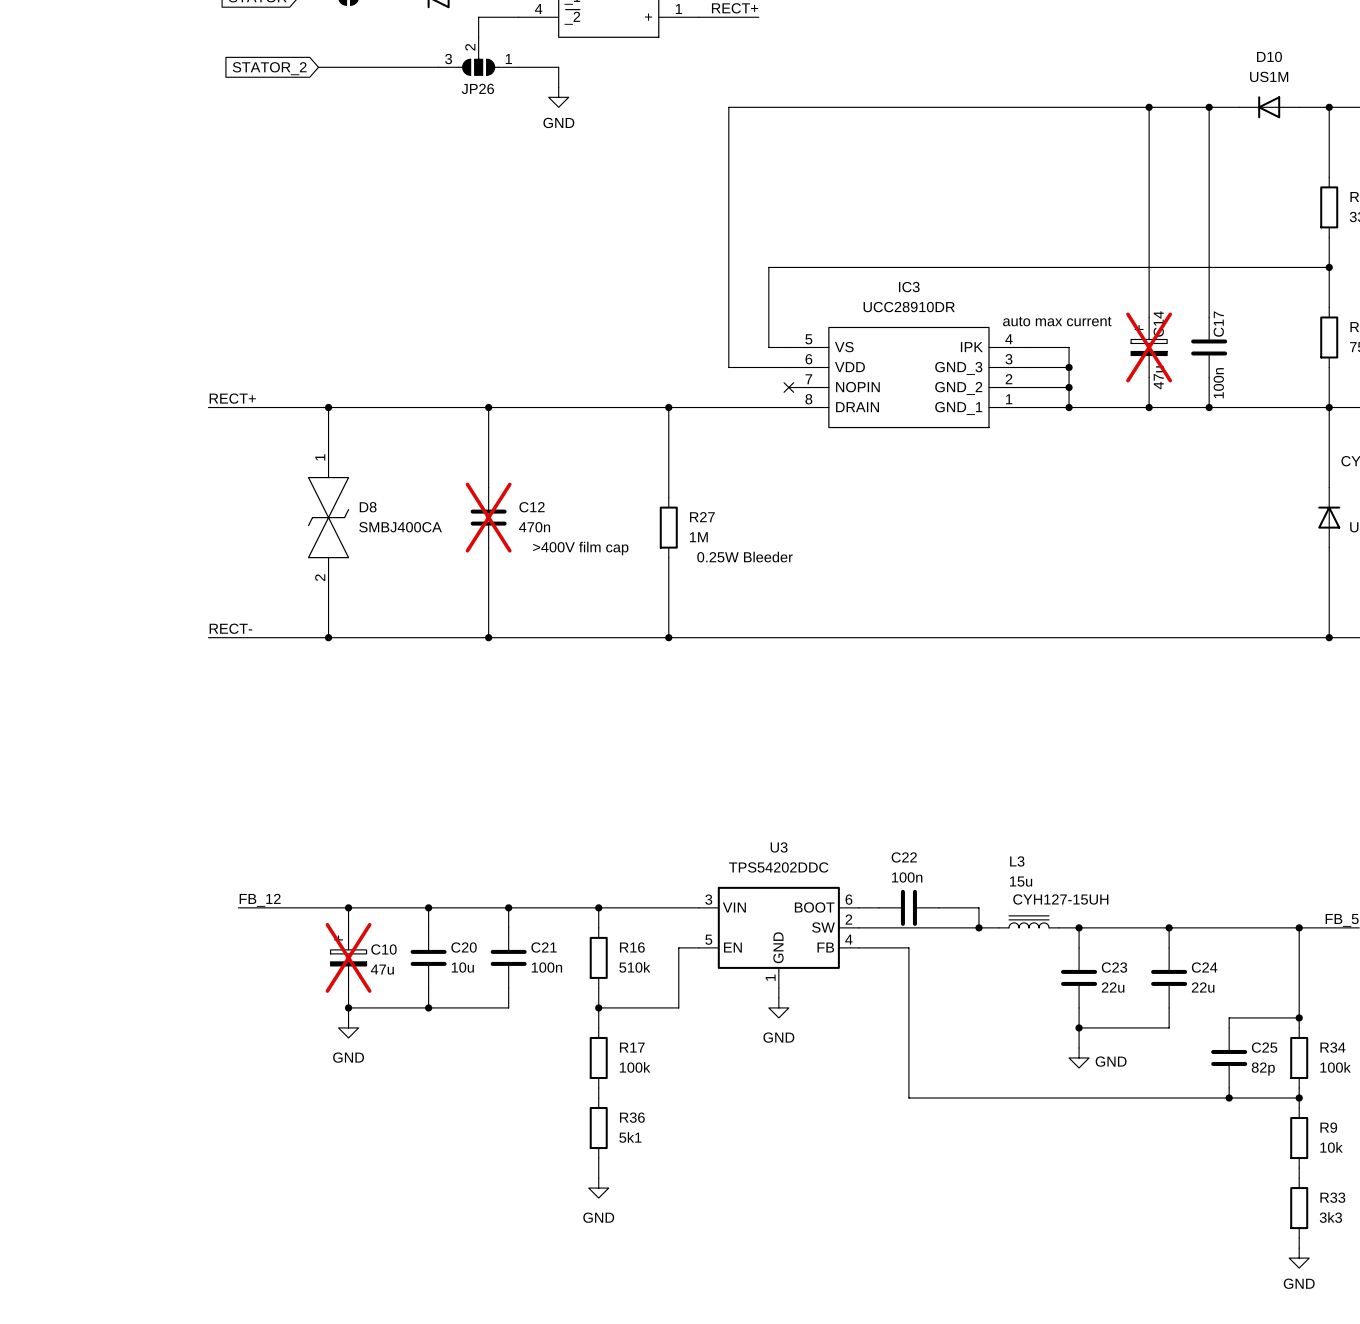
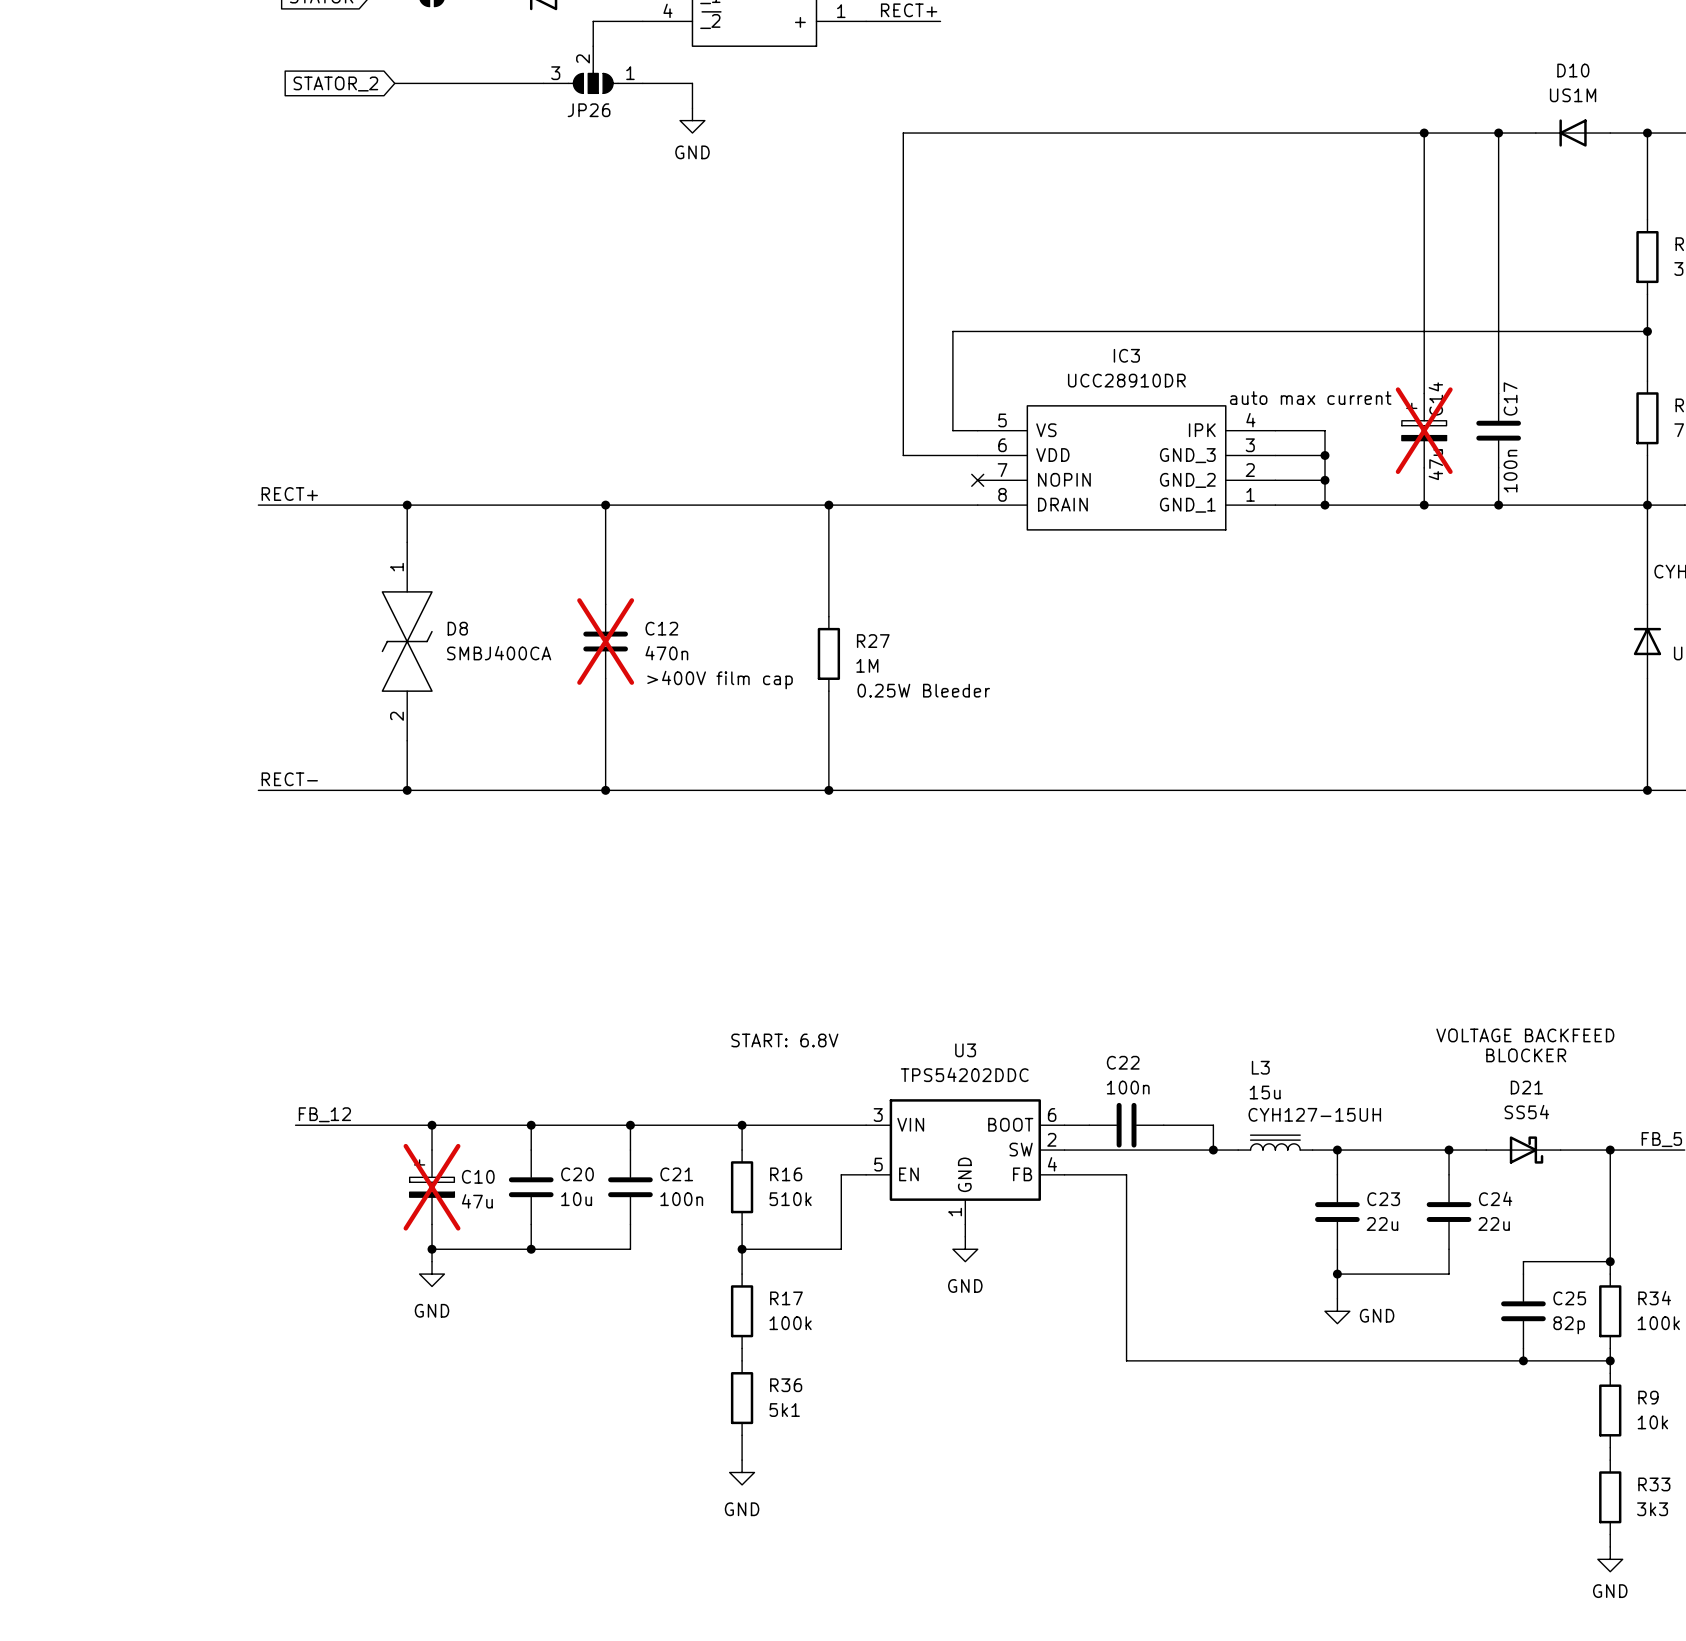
text: none -> VOLTAGE BACKFEED (1525, 1035)
text: none -> START: 6.8V (784, 1040)
text: none -> BLOCKER (1526, 1055)
D21: none -> SS54 (1523, 1150)

